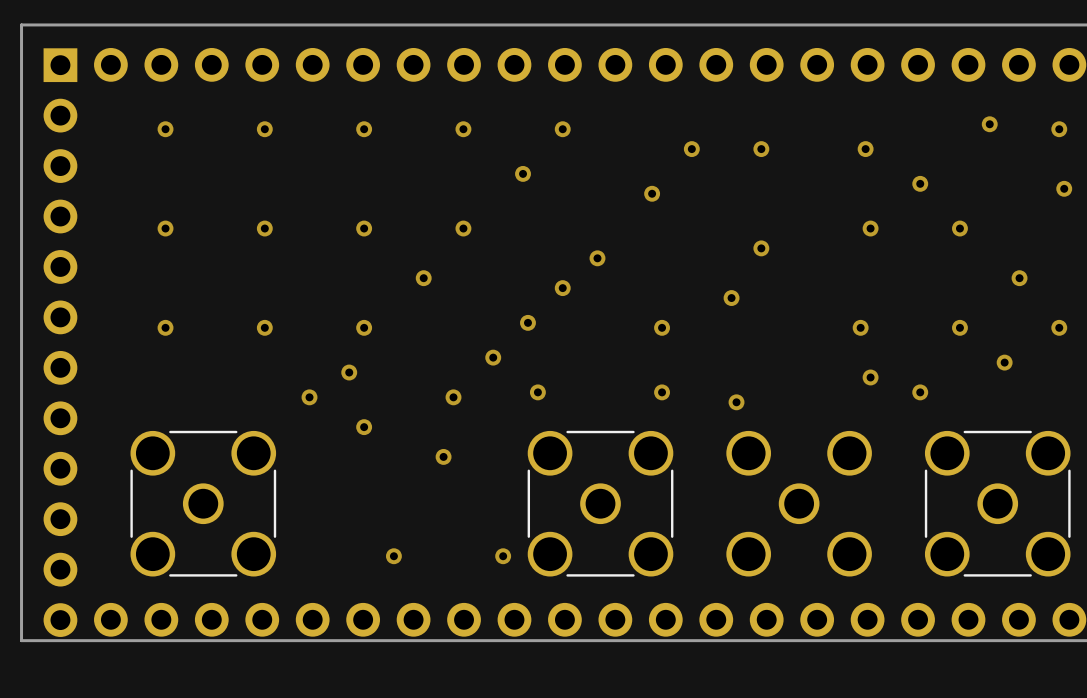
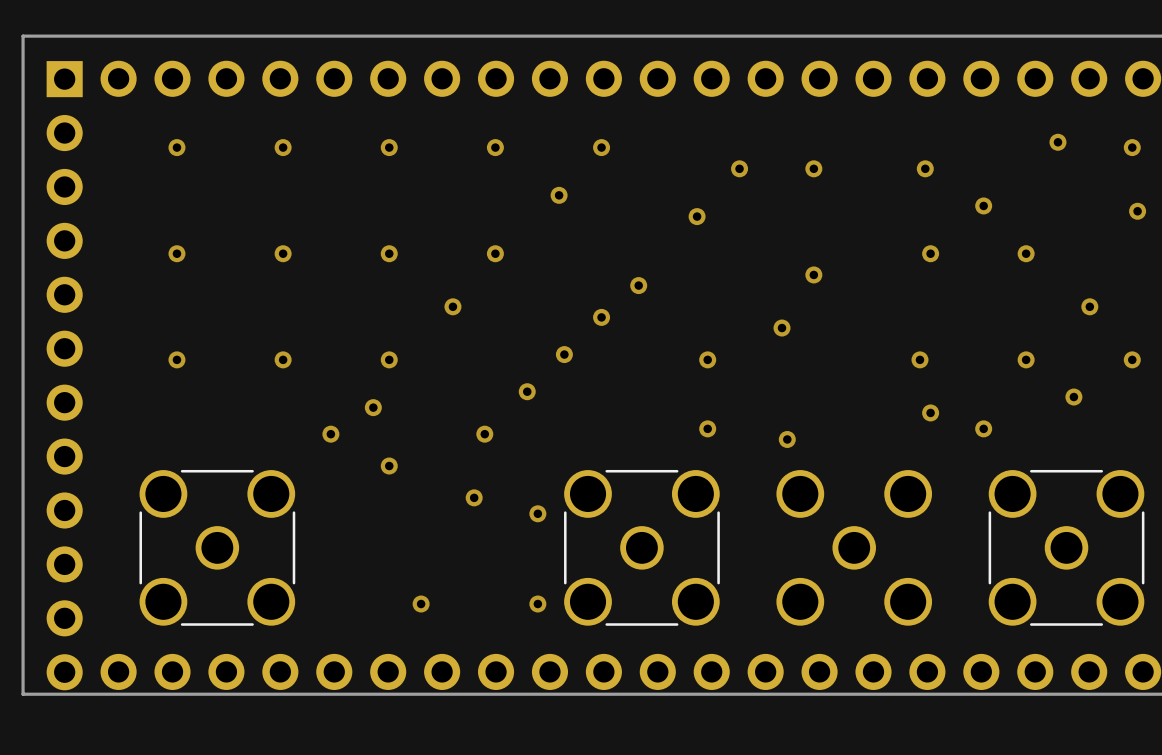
via position: (537, 392) -> (537, 513)

